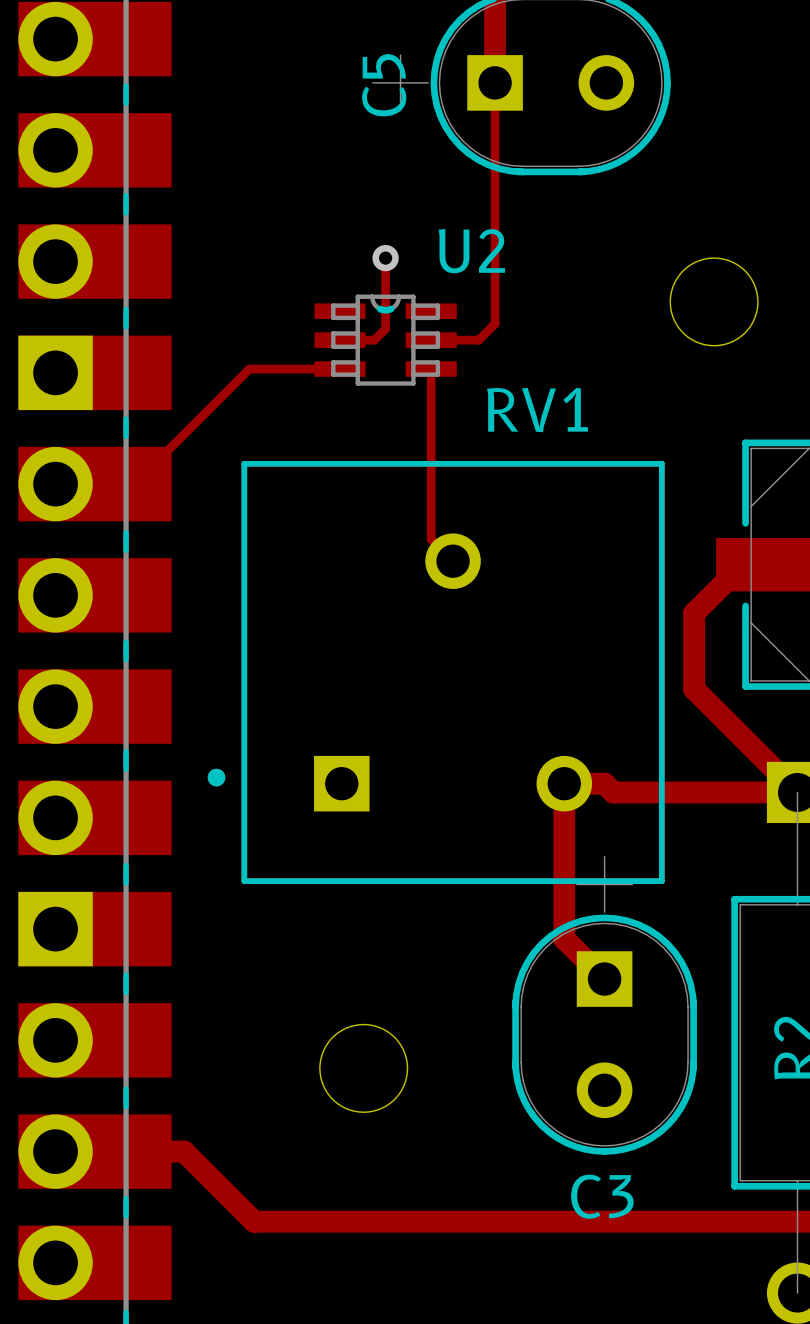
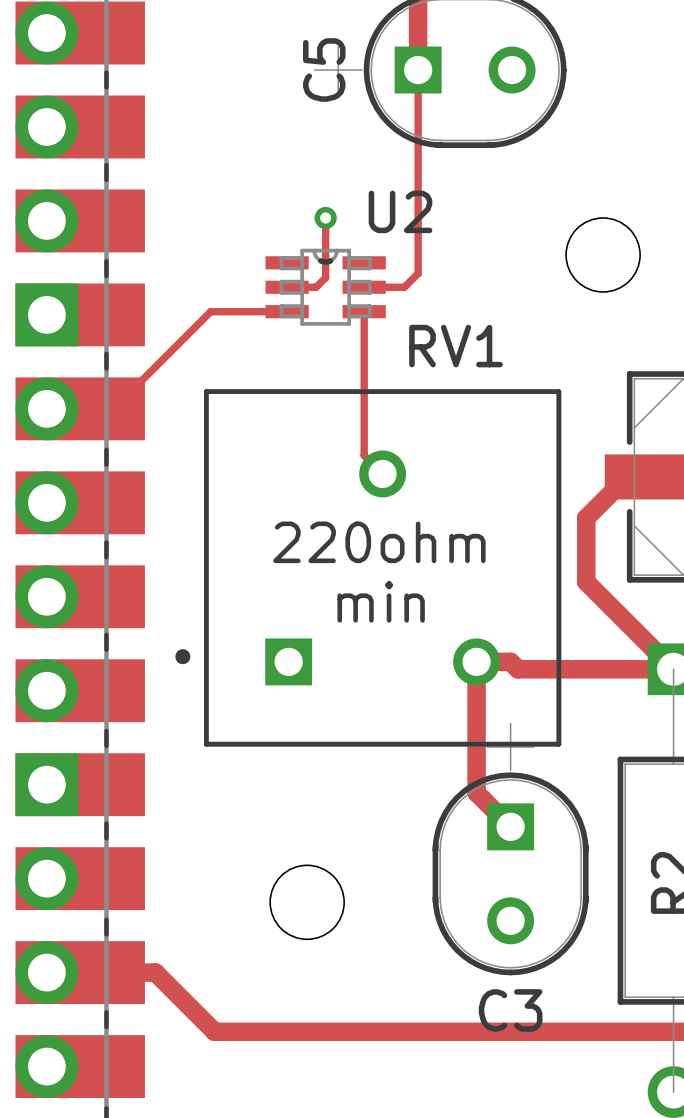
text: none -> 220ohm (379, 542)
text: none -> min (381, 601)

